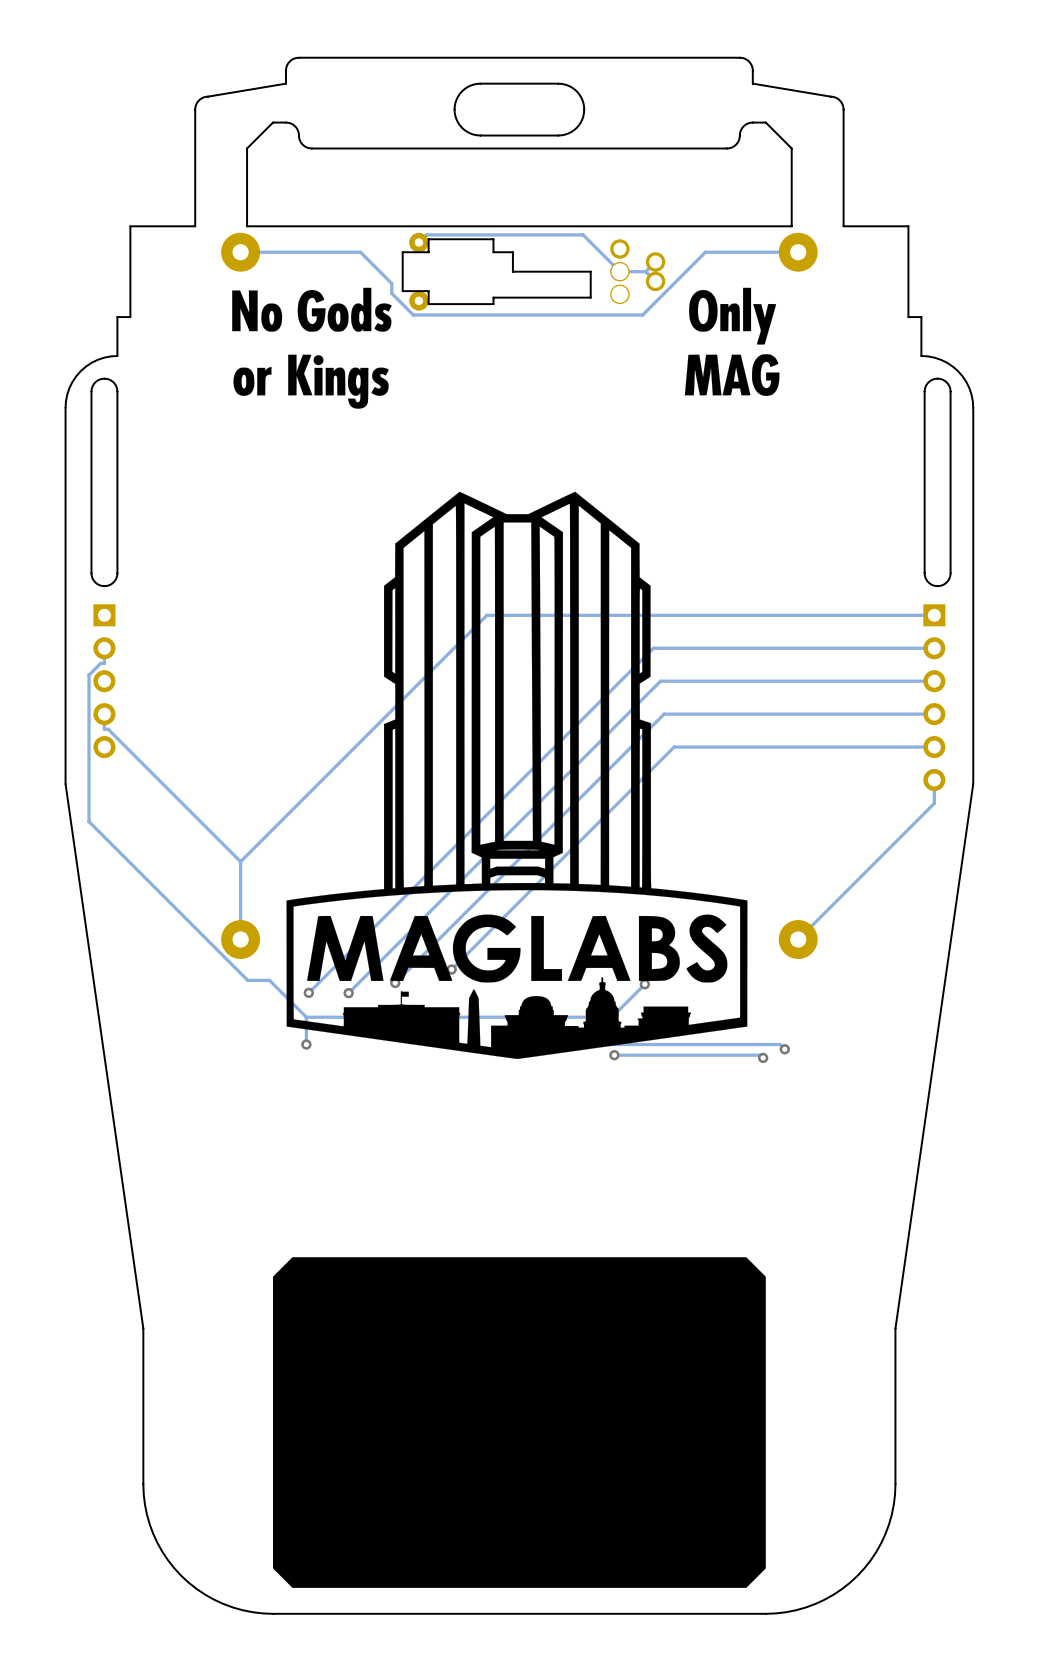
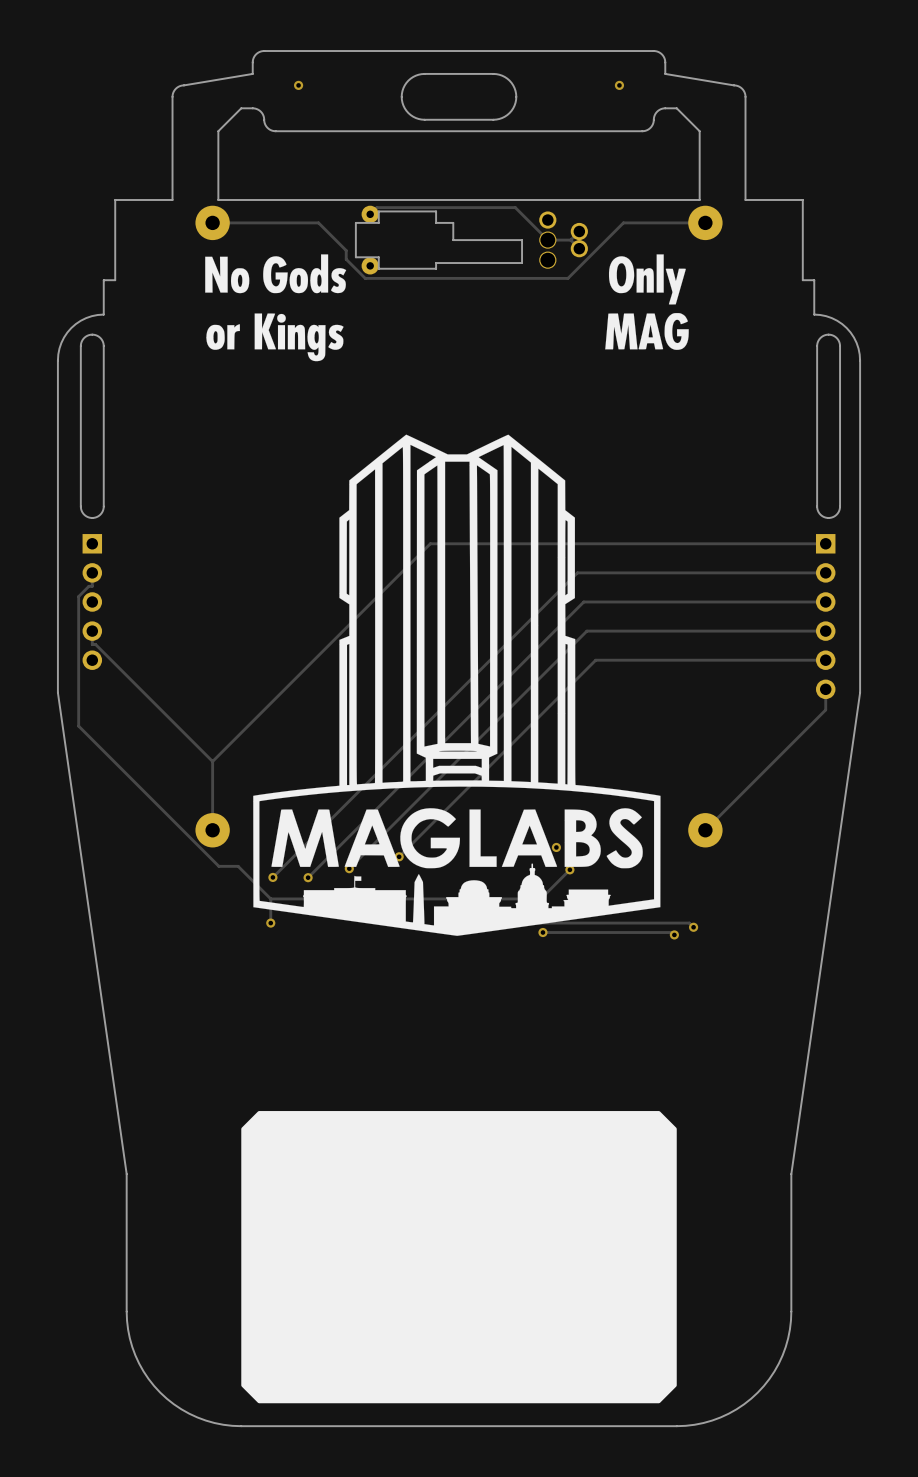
via: none -> (298, 85)
via: none -> (619, 85)
via: none -> (556, 847)

